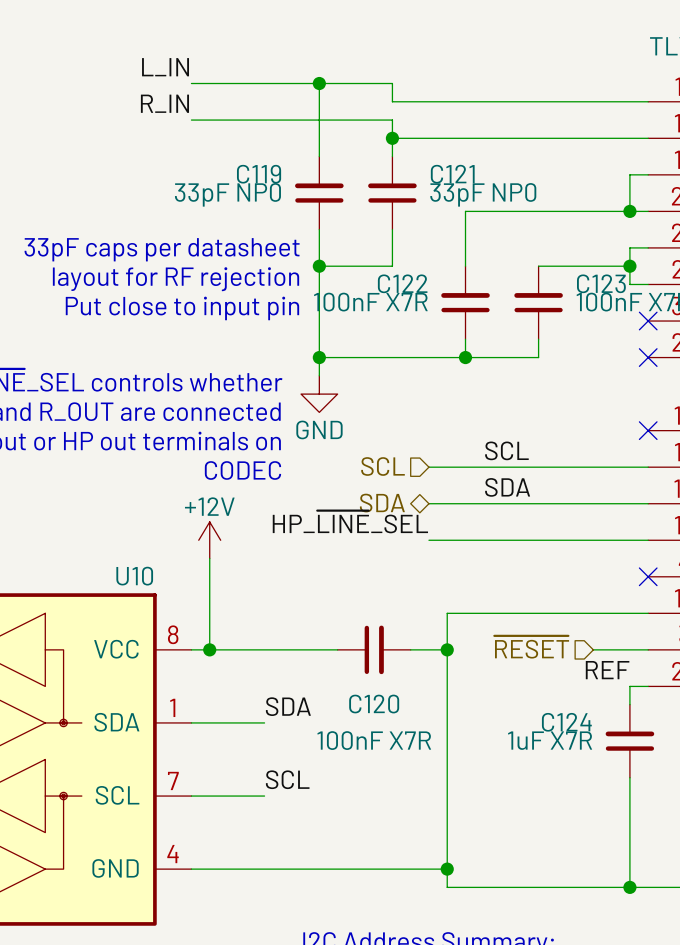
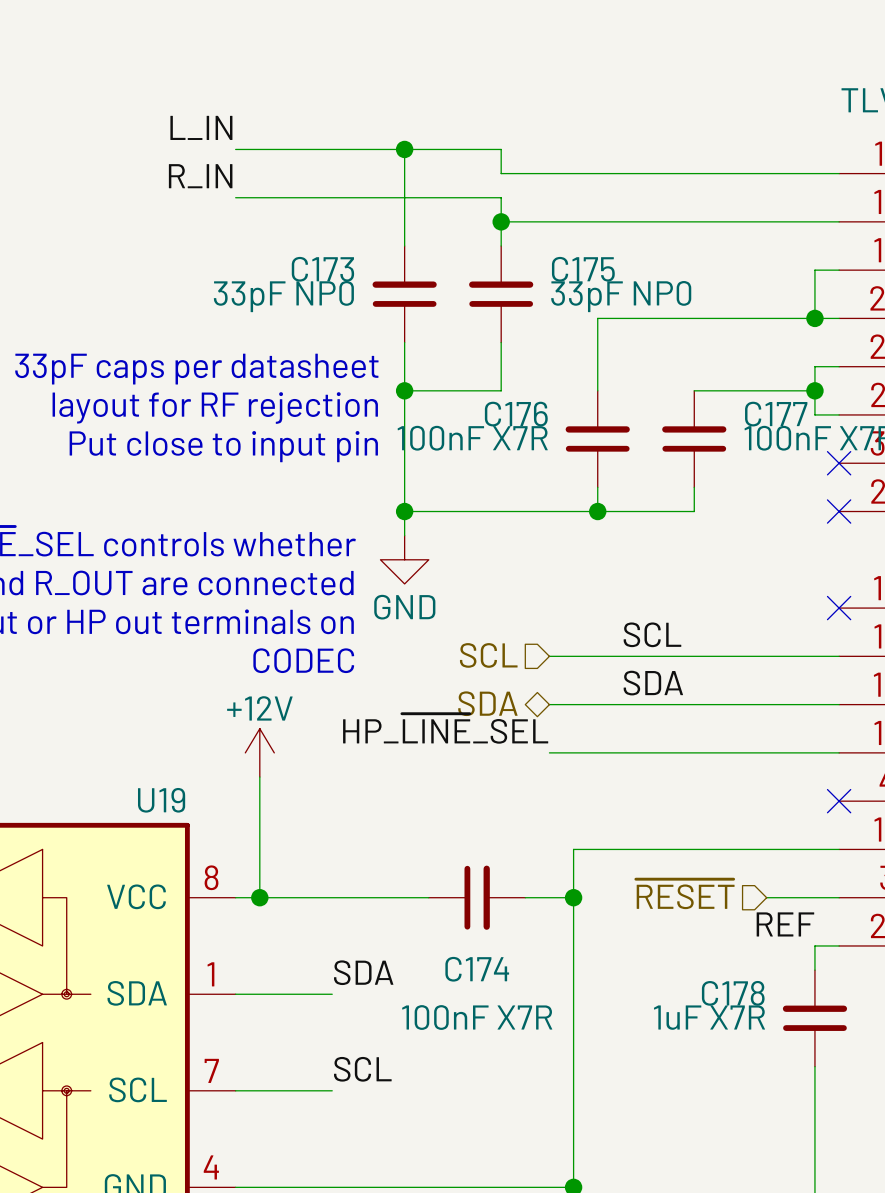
C119 name: C119 (259, 174) -> C173 (322, 269)
C121 name: C121 (452, 174) -> C175 (583, 269)
C122 name: C122 (402, 283) -> C176 (516, 414)
C123 name: C123 (601, 283) -> C177 (776, 414)
U10 name: U10 (134, 576) -> U19 (161, 800)
C120 name: C120 (374, 704) -> C174 (477, 969)
C124 name: C124 (566, 722) -> C178 (733, 993)

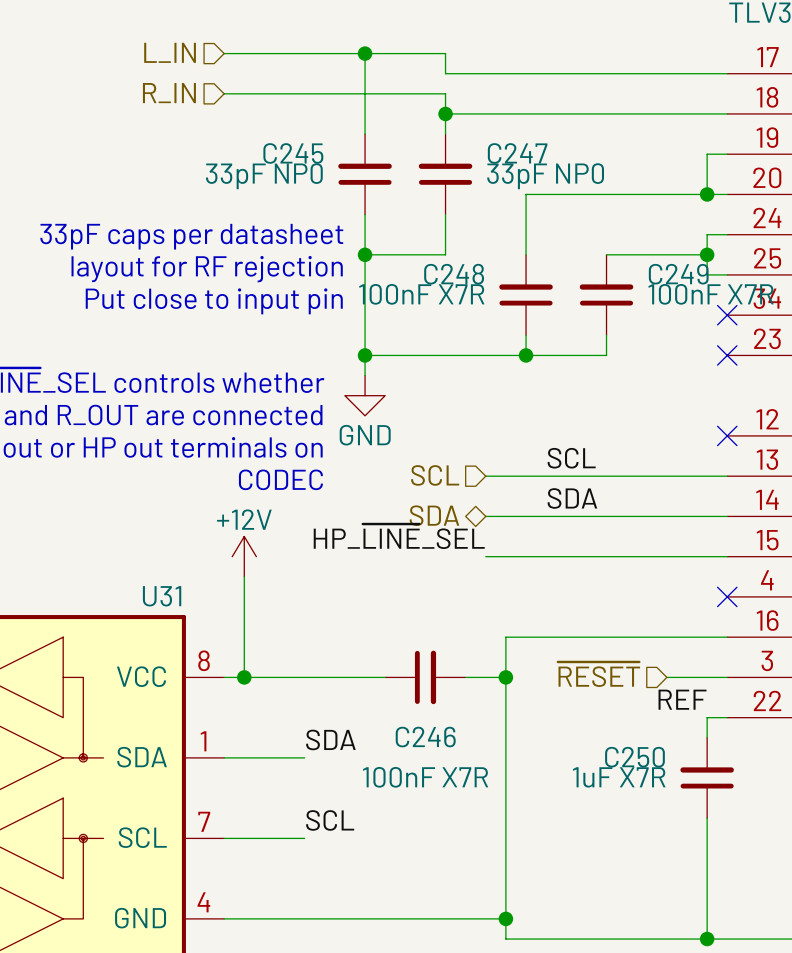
label: L_IN (201, 127) -> none
hierarchical label: none -> L_IN (170, 52)
label: R_IN (200, 176) -> none
hierarchical label: none -> R_IN (169, 93)
C173 name: C173 (322, 269) -> C245 (293, 153)
C175 name: C175 (583, 269) -> C247 (517, 153)
C176 name: C176 (516, 414) -> C248 (454, 274)
C177 name: C177 (776, 414) -> C249 (678, 274)
U19 name: U19 (161, 800) -> U31 (162, 596)
C174 name: C174 (477, 969) -> C246 (425, 737)
C178 name: C178 (733, 993) -> C250 (634, 757)

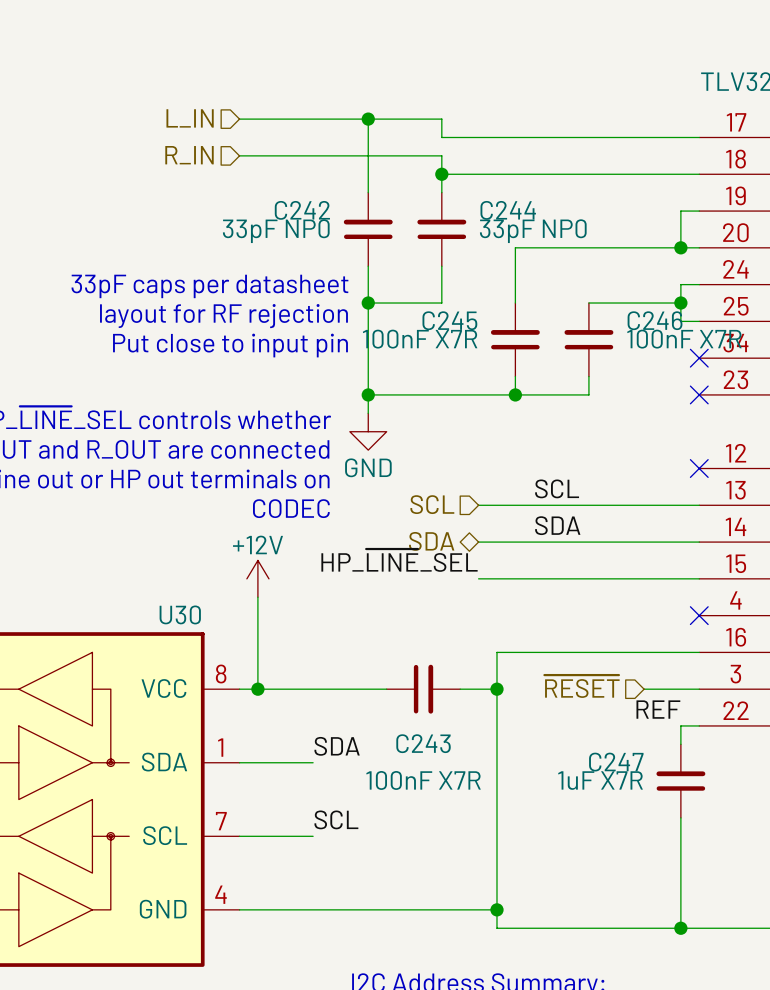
C245 name: C245 (293, 153) -> C242 (302, 210)
C247 name: C247 (517, 153) -> C244 (508, 210)
C248 name: C248 (454, 274) -> C245 (449, 320)
C249 name: C249 (678, 274) -> C246 (655, 320)
U31 name: U31 (162, 596) -> U30 (180, 614)
C246 name: C246 (425, 737) -> C243 (423, 743)
C250 name: C250 (634, 757) -> C247 (616, 762)

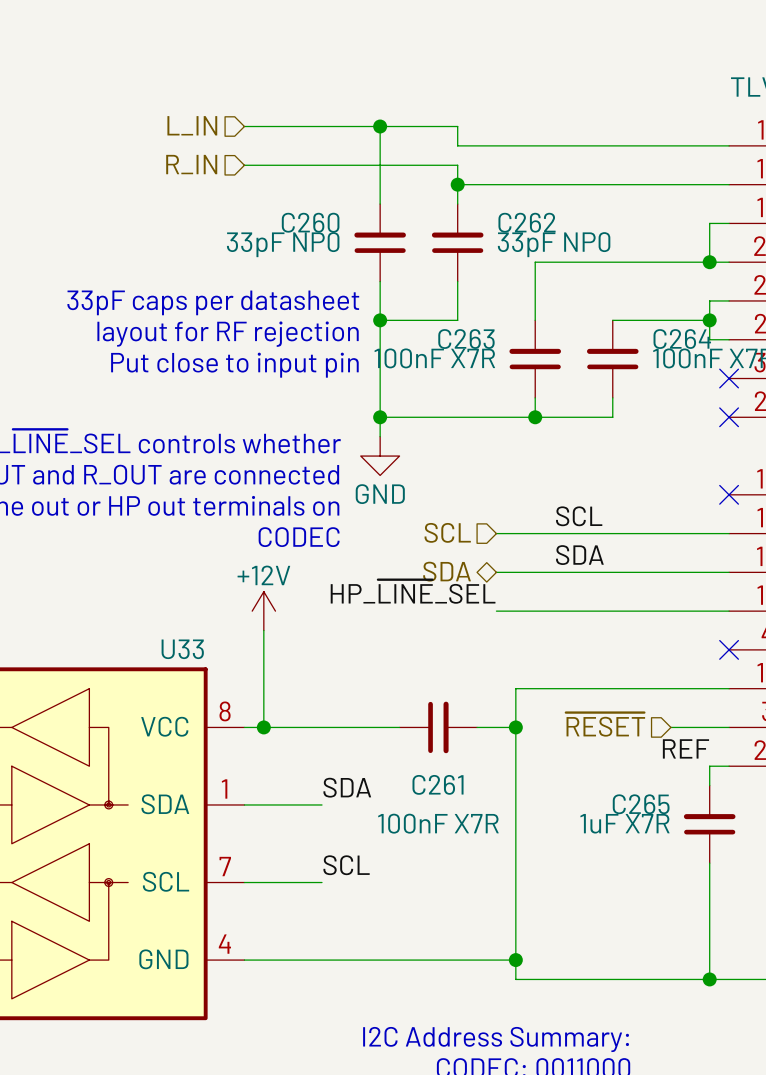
C242 name: C242 (302, 210) -> C260 (310, 222)
C244 name: C244 (508, 210) -> C262 (527, 222)
C245 name: C245 (449, 320) -> C263 (466, 339)
C246 name: C246 (655, 320) -> C264 (682, 339)
U30 name: U30 (180, 614) -> U33 (182, 649)
C243 name: C243 (423, 743) -> C261 (438, 784)
C247 name: C247 (616, 762) -> C265 (641, 804)

